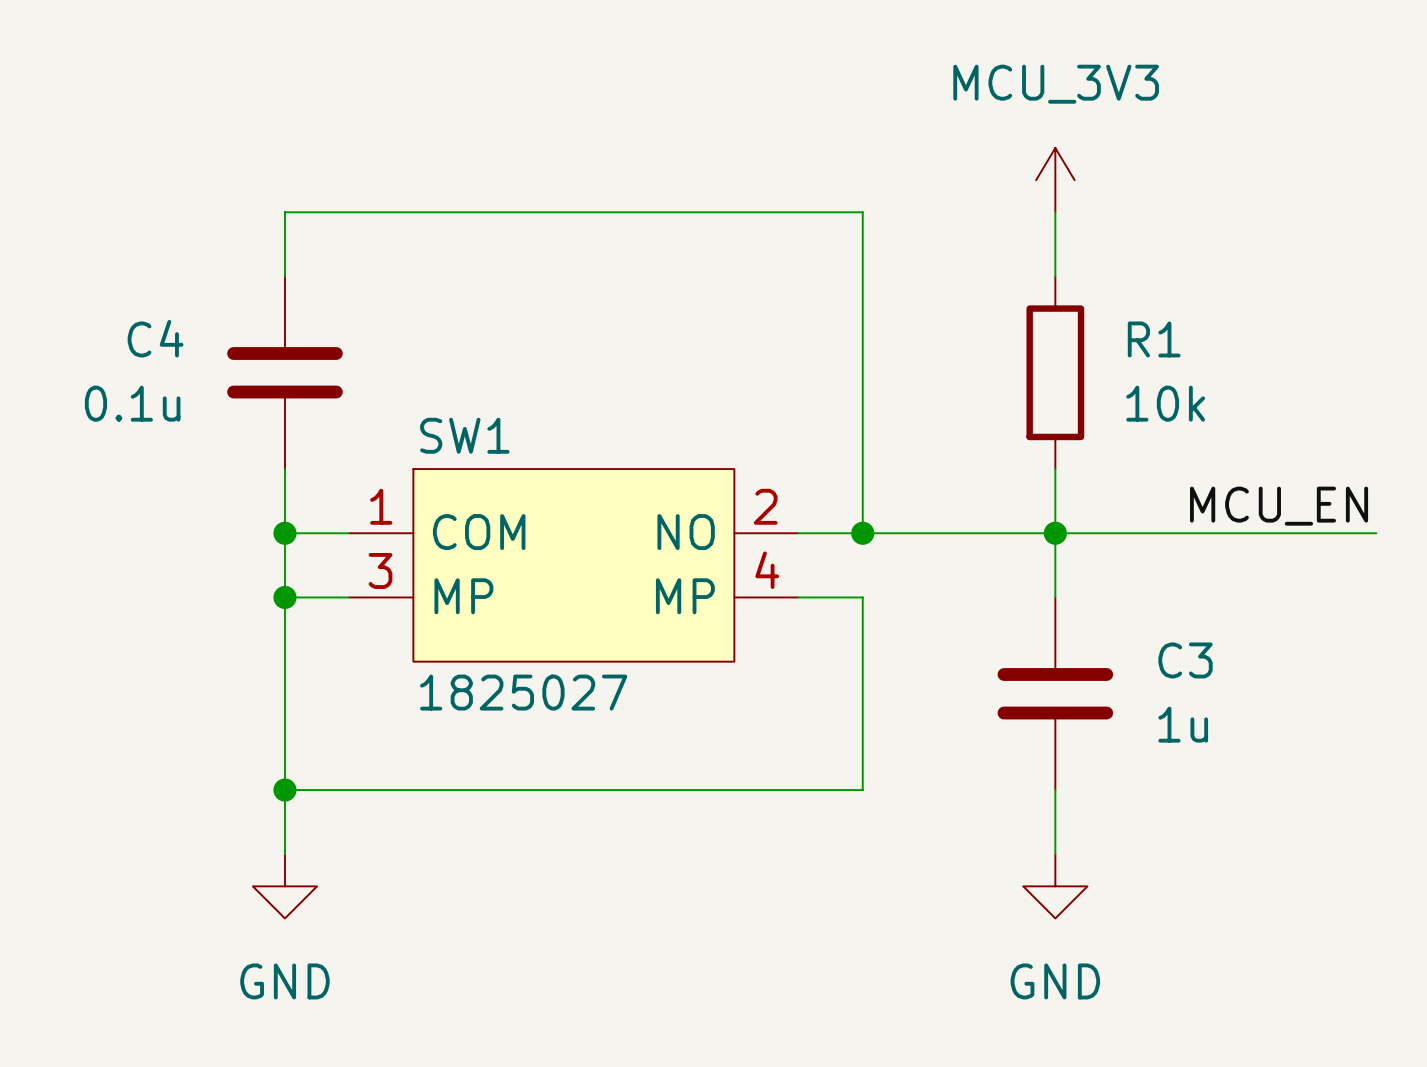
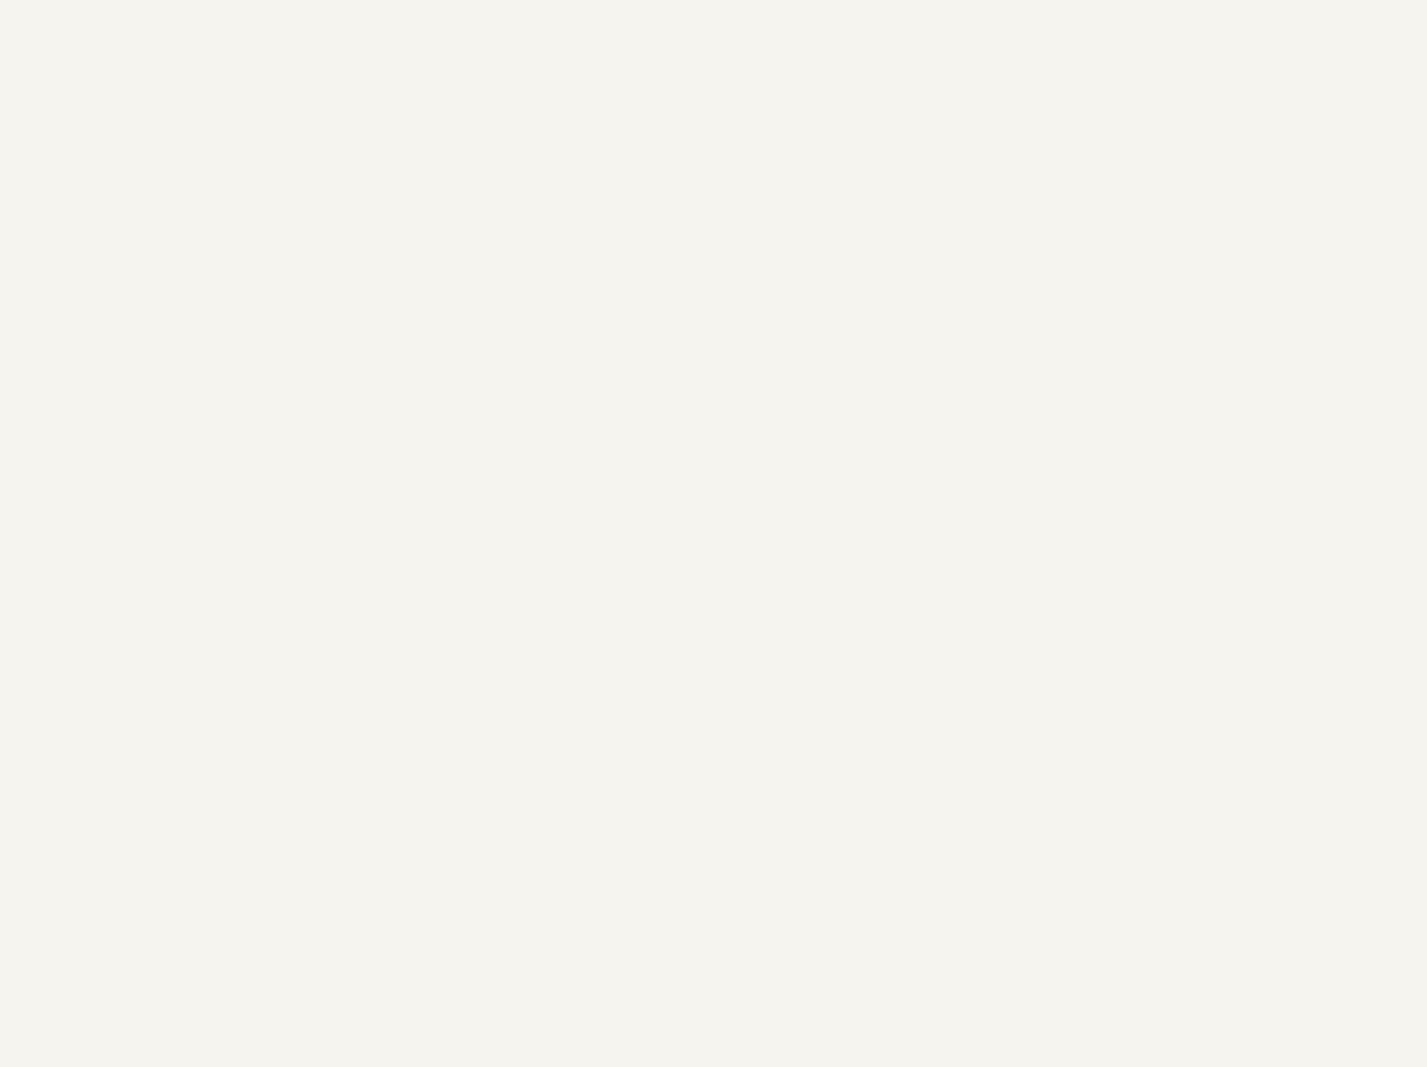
power symbol: MCU_3V3 (1055, 180) -> none
wire: (1055, 212) (1055, 276) -> none
wire: (284, 276) (284, 212) (862, 212) (862, 533) -> none
C4: 0.1u (284, 372) -> none
R1: 10k (1055, 372) -> none
wire: (284, 469) (284, 854) -> none
wire: (1055, 469) (1055, 597) -> none
label: MCU_EN (1279, 506) -> none
wire: (284, 533) (349, 533) -> none
junction: (284, 533) -> none
wire: (798, 533) (1376, 533) -> none
junction: (862, 533) -> none
junction: (1055, 533) -> none
SW1: 1825027 (573, 565) -> none
wire: (284, 597) (349, 597) -> none
junction: (284, 597) -> none
wire: (798, 597) (862, 597) (862, 790) (284, 790) -> none
C3: 1u (1055, 693) -> none
junction: (284, 790) -> none
wire: (1055, 790) (1055, 854) -> none
power symbol: GND (284, 886) -> none
power symbol: GND (1055, 886) -> none

